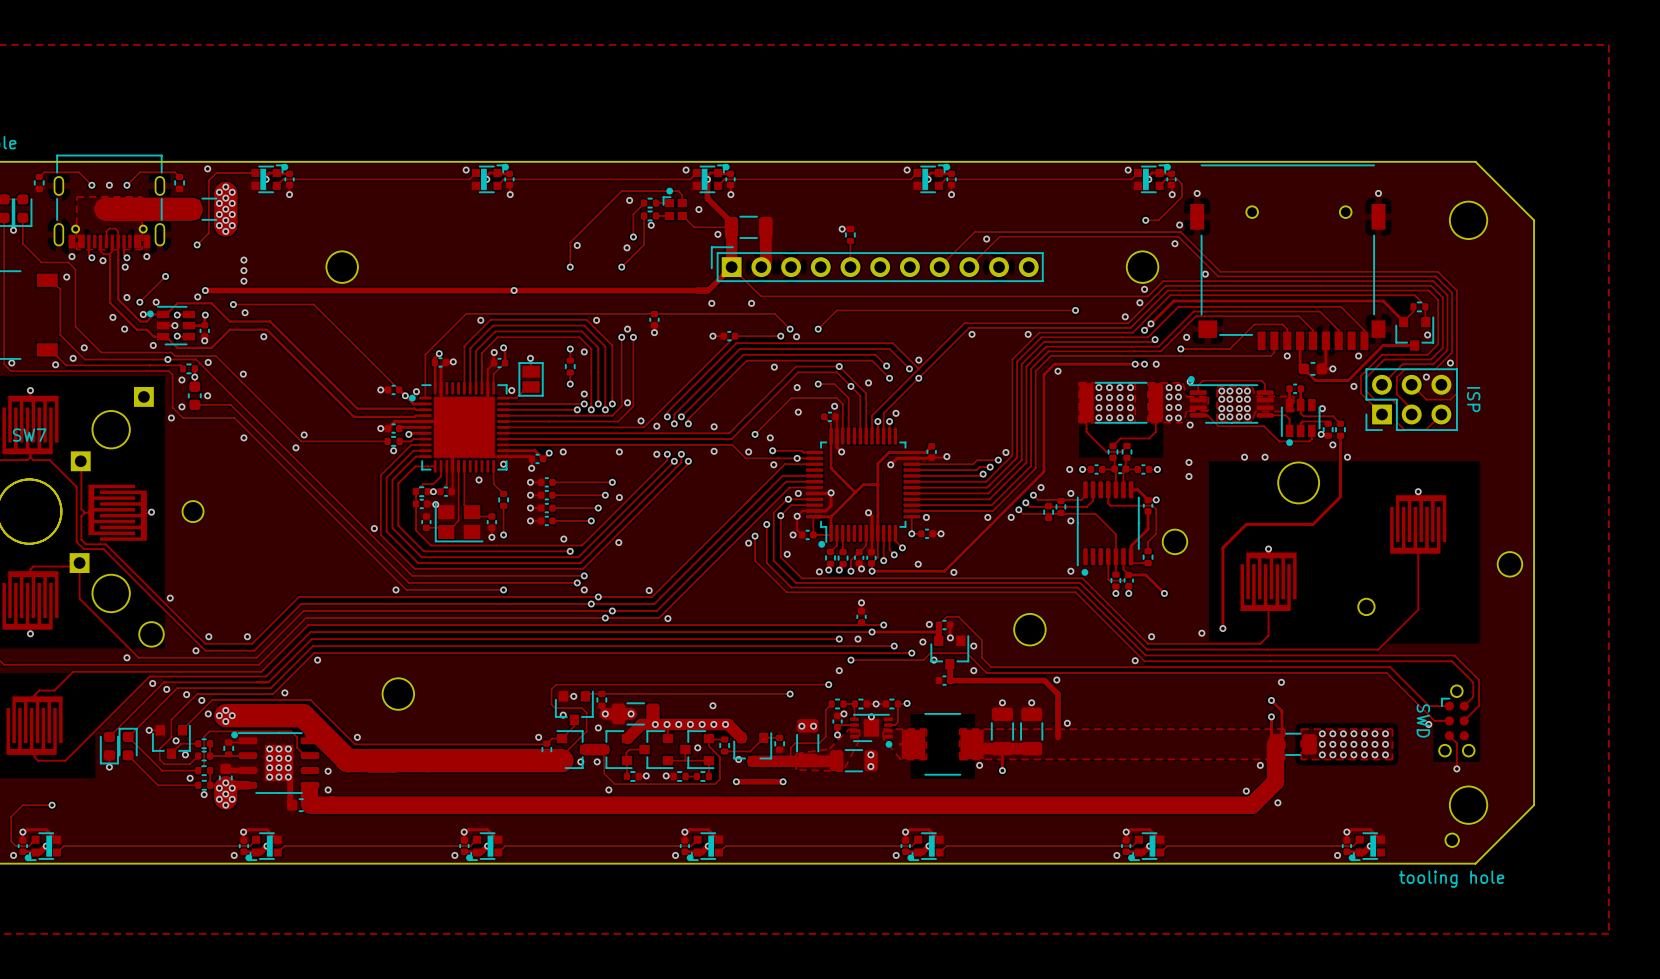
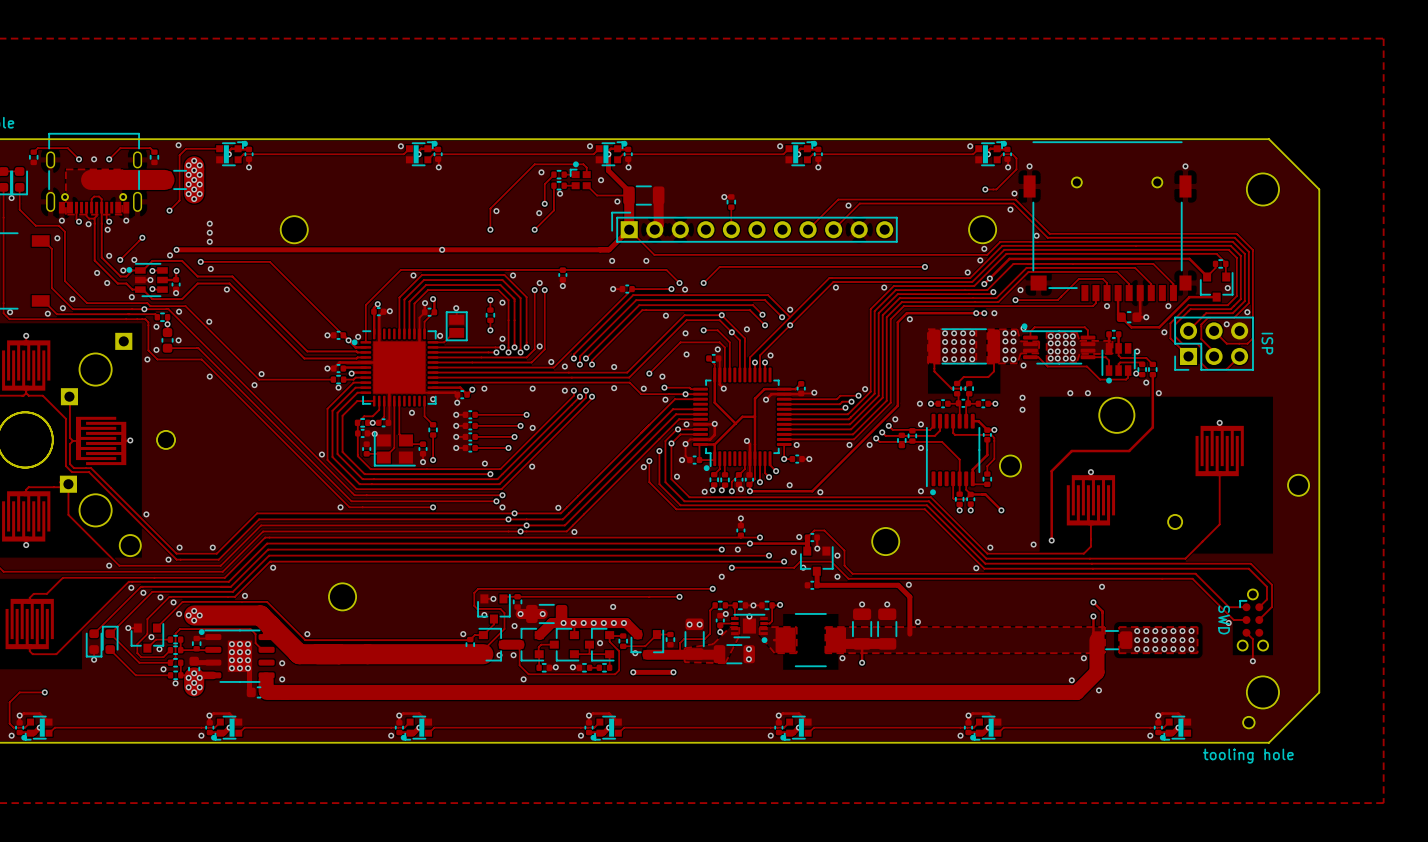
SW7 name: SW7 (29, 435) -> none

